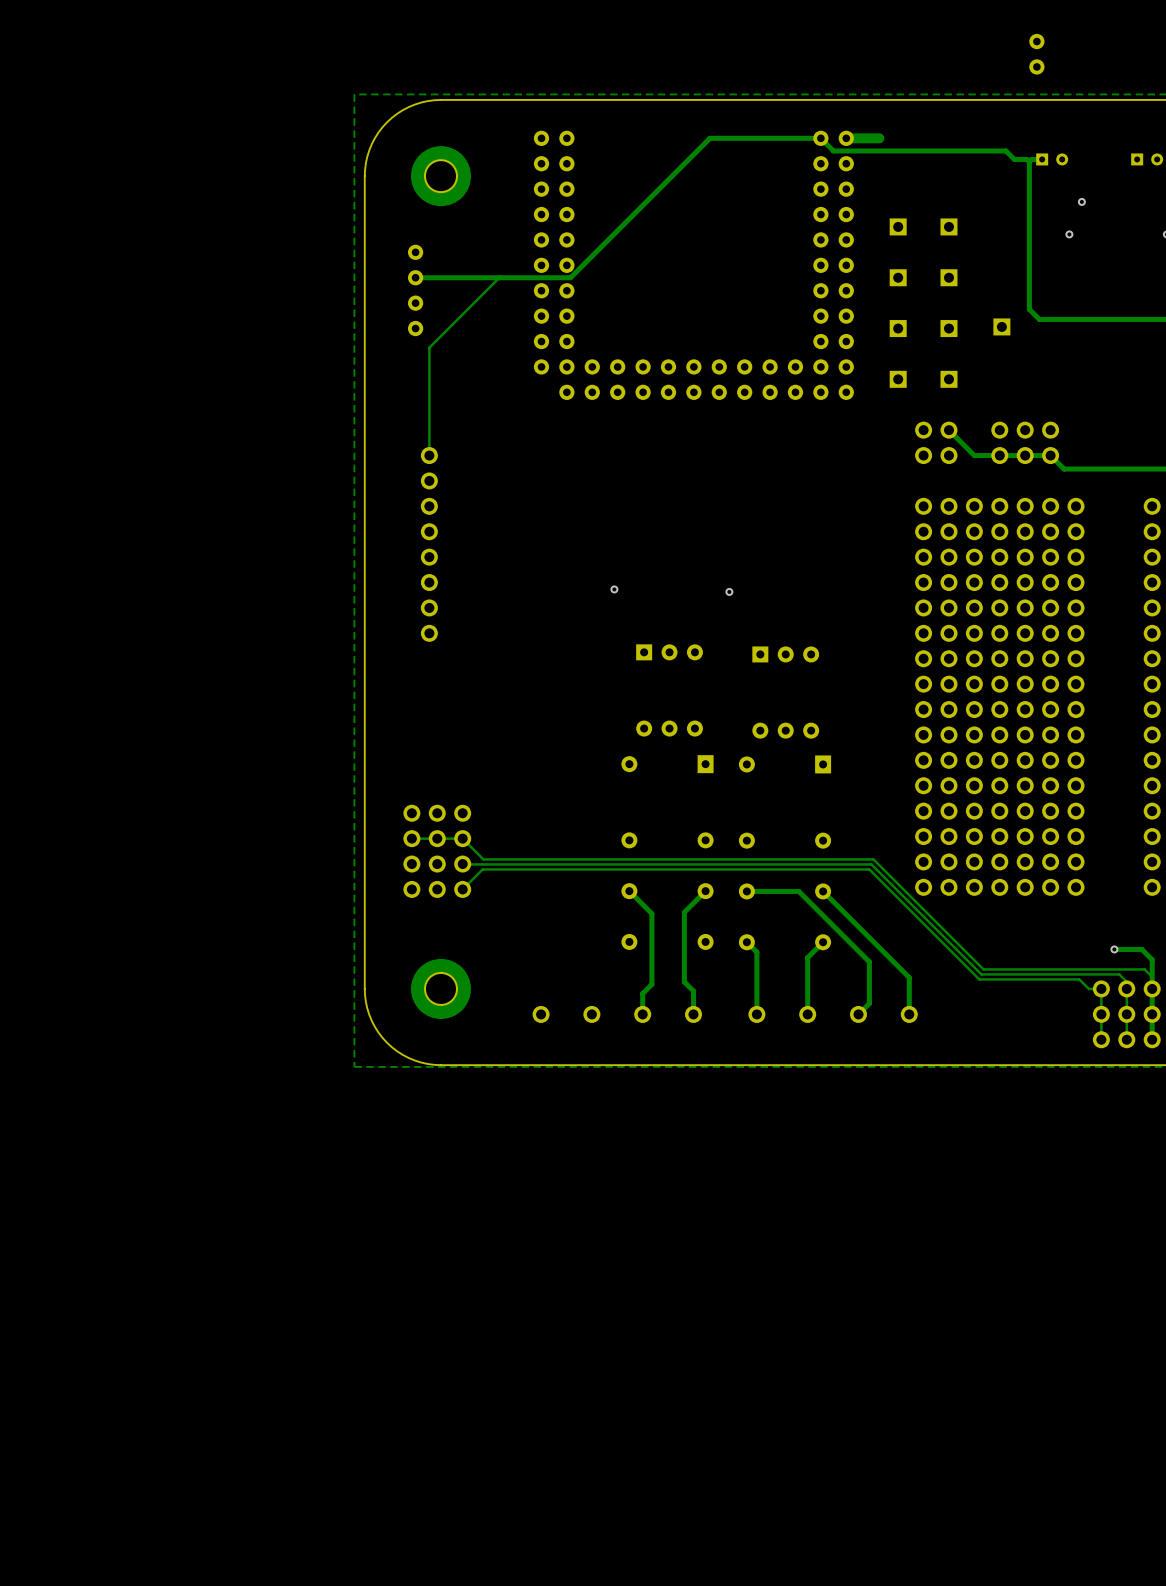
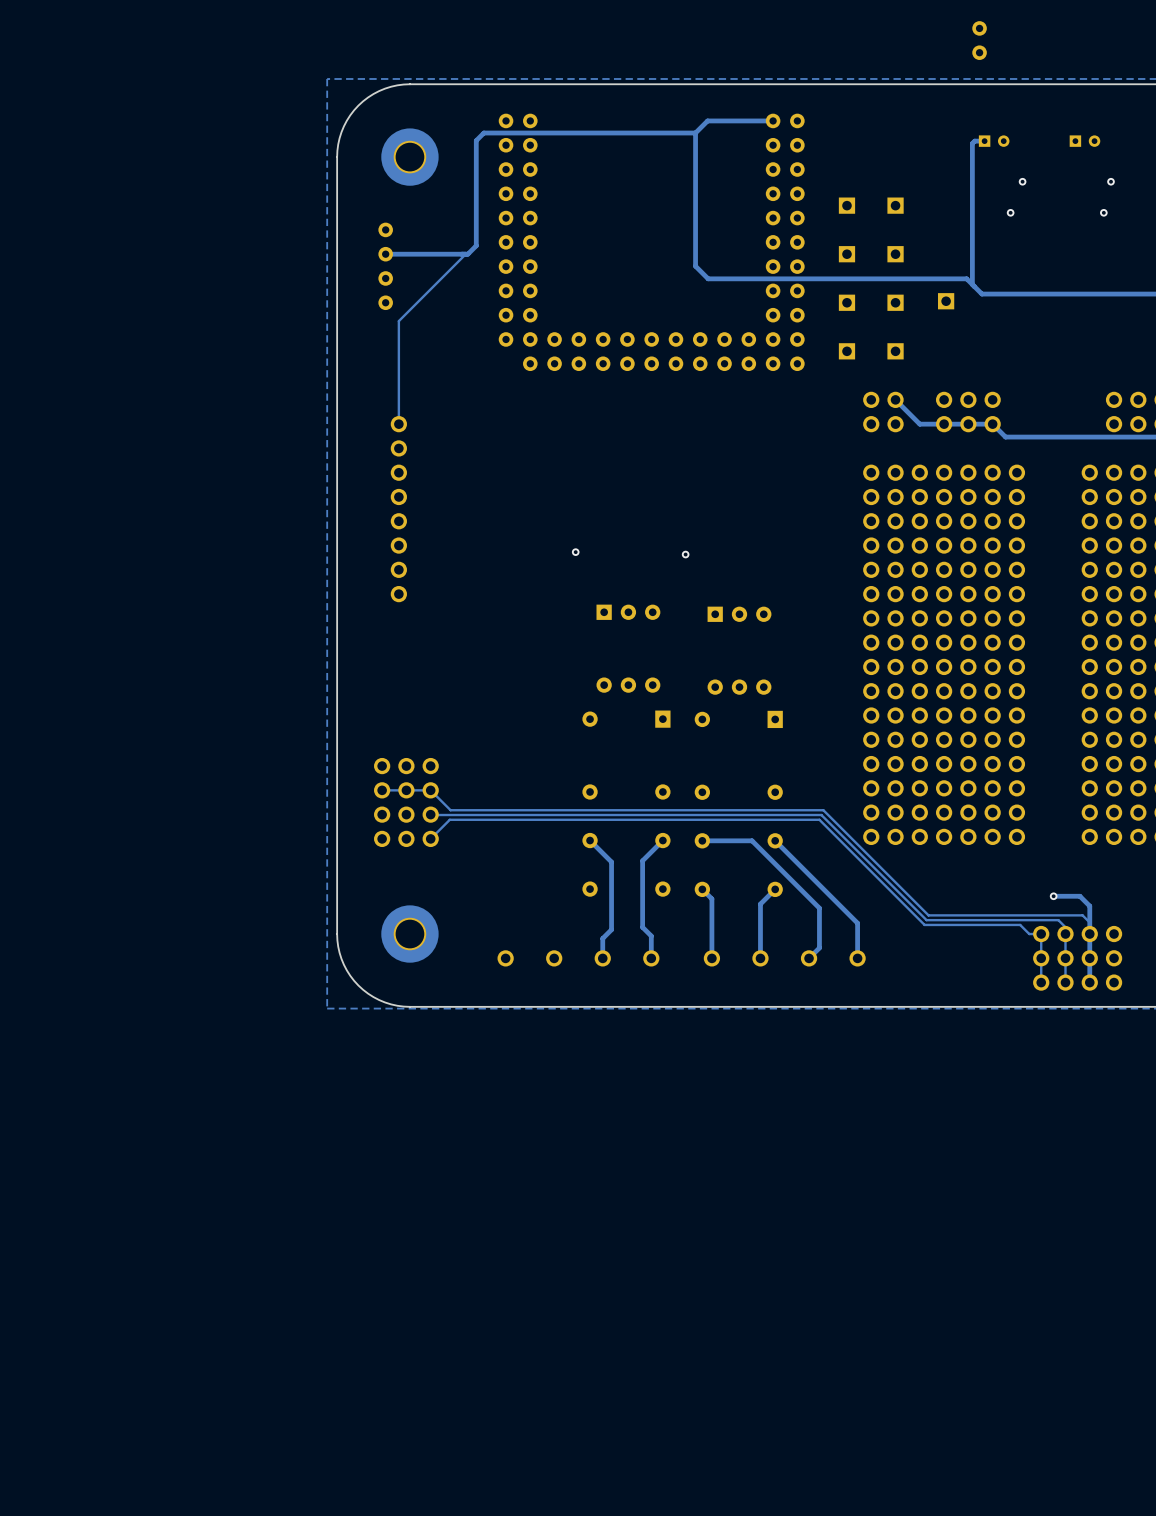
track: (752, 138) (709, 138) (570, 277) (501, 277) -> (695, 133) (483, 133) (476, 140) (476, 245) (467, 254)
track: none -> (707, 120) (695, 133)
track: (820, 138) (833, 150) (1005, 150) (1014, 159) (1026, 159) (1029, 161) -> none
track: (879, 138) (846, 138) -> none
track: none -> (695, 133) (695, 266) (708, 278) (966, 278) (972, 284)

